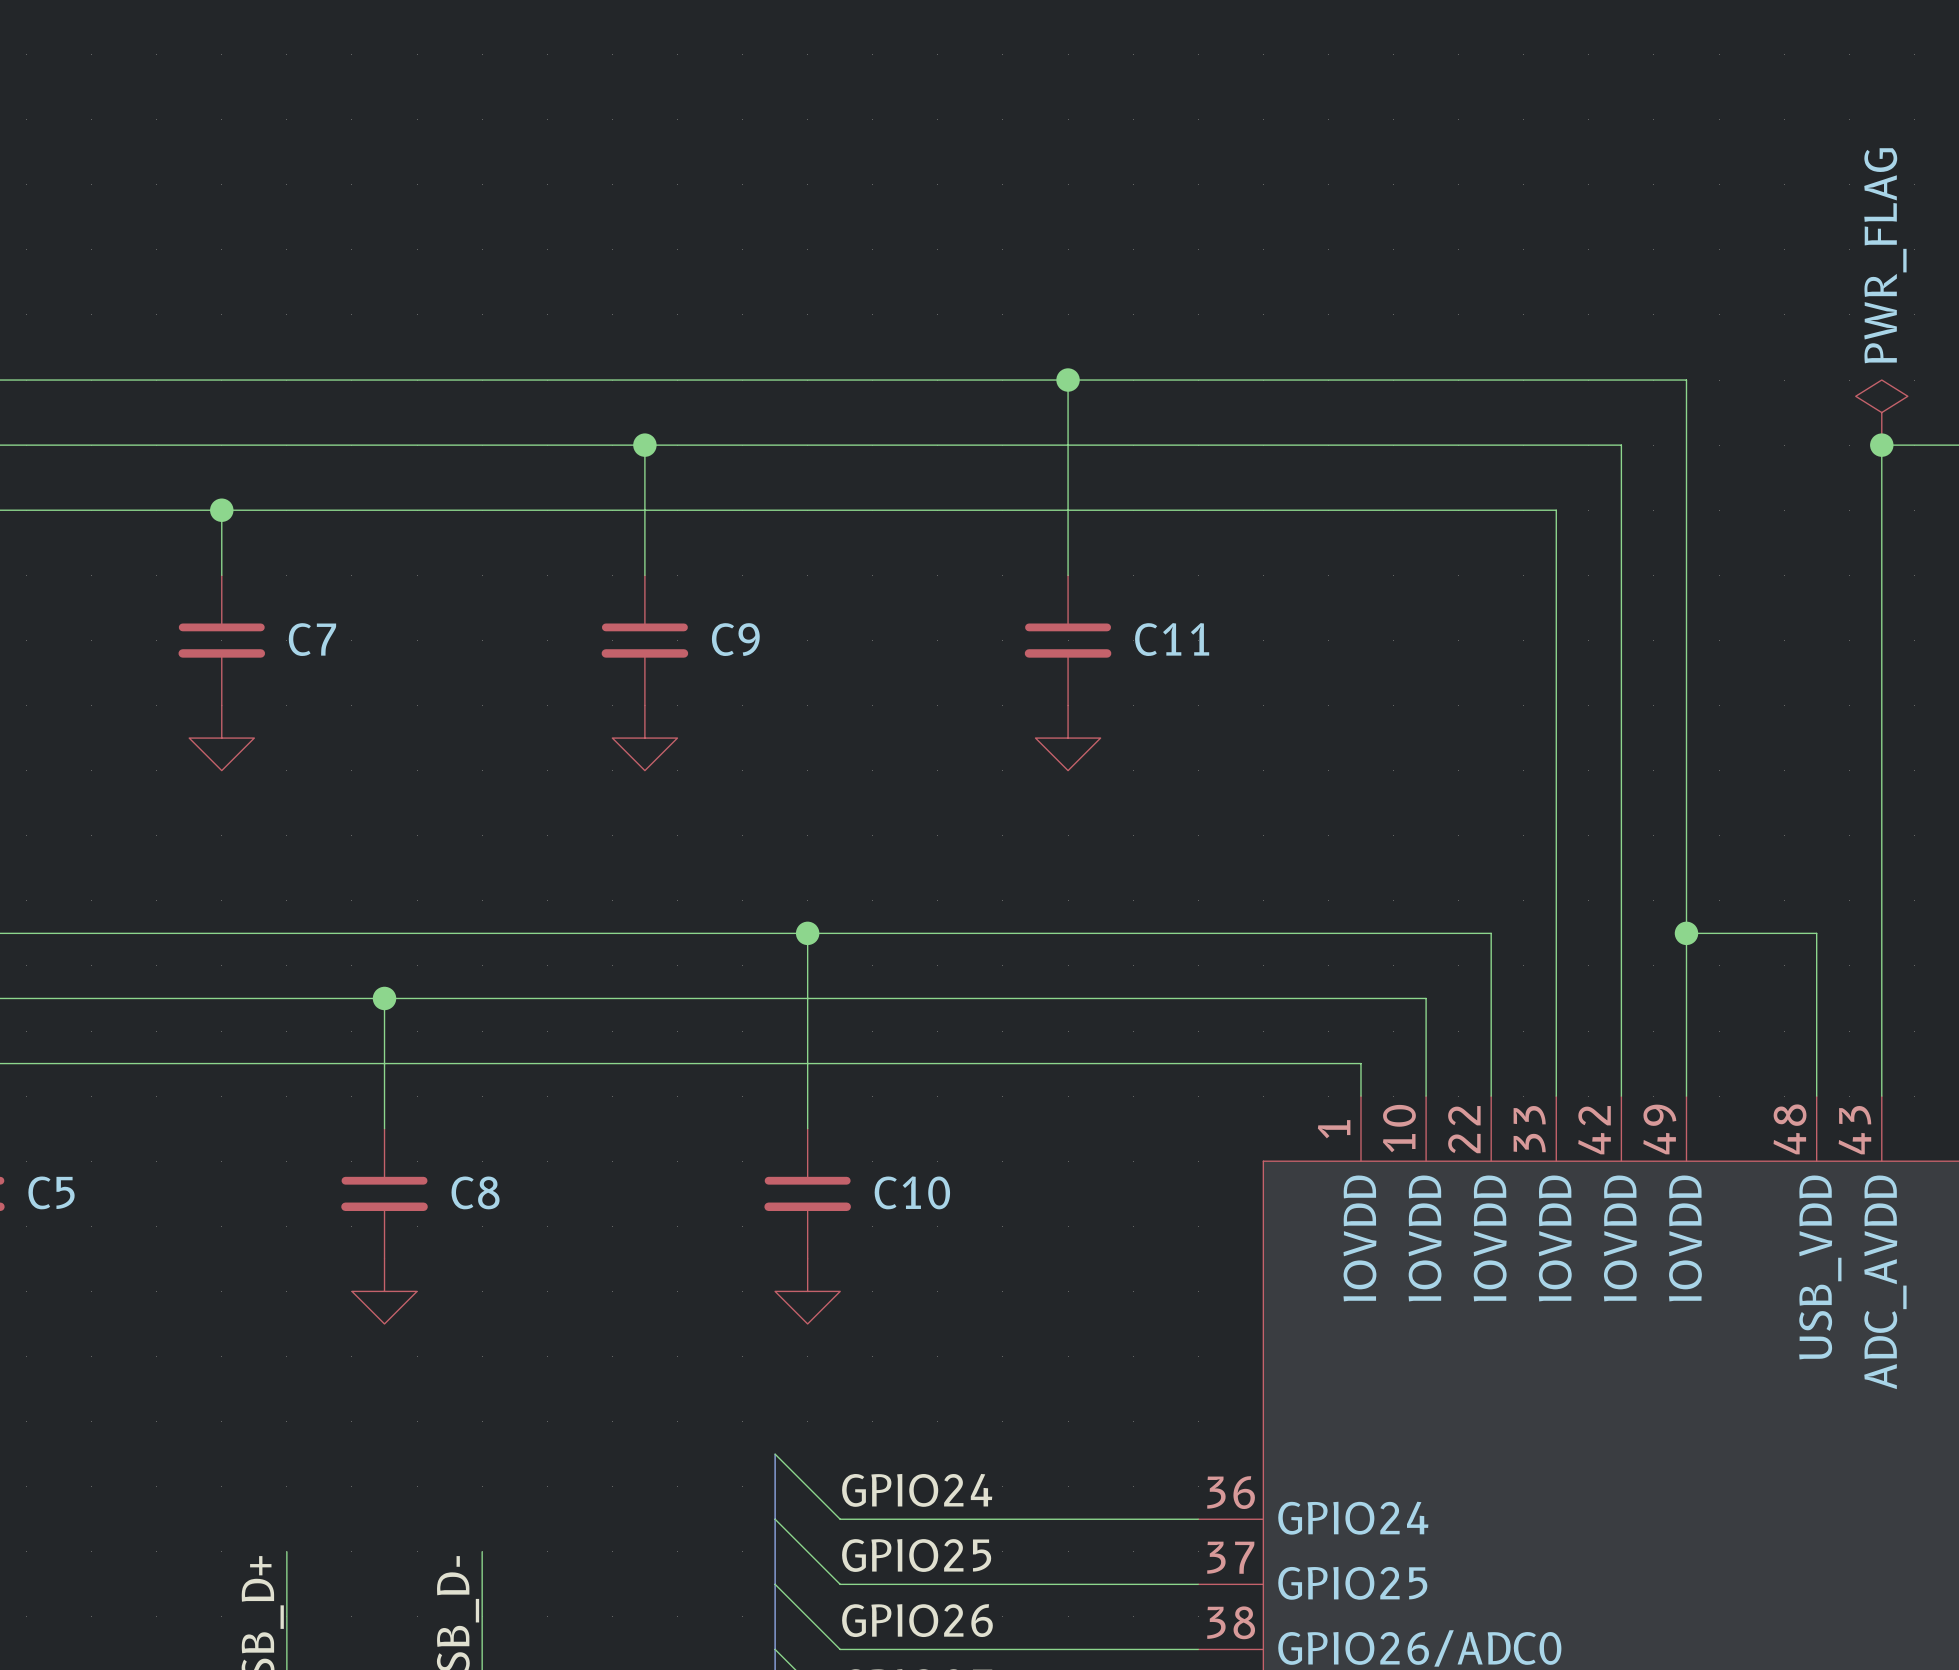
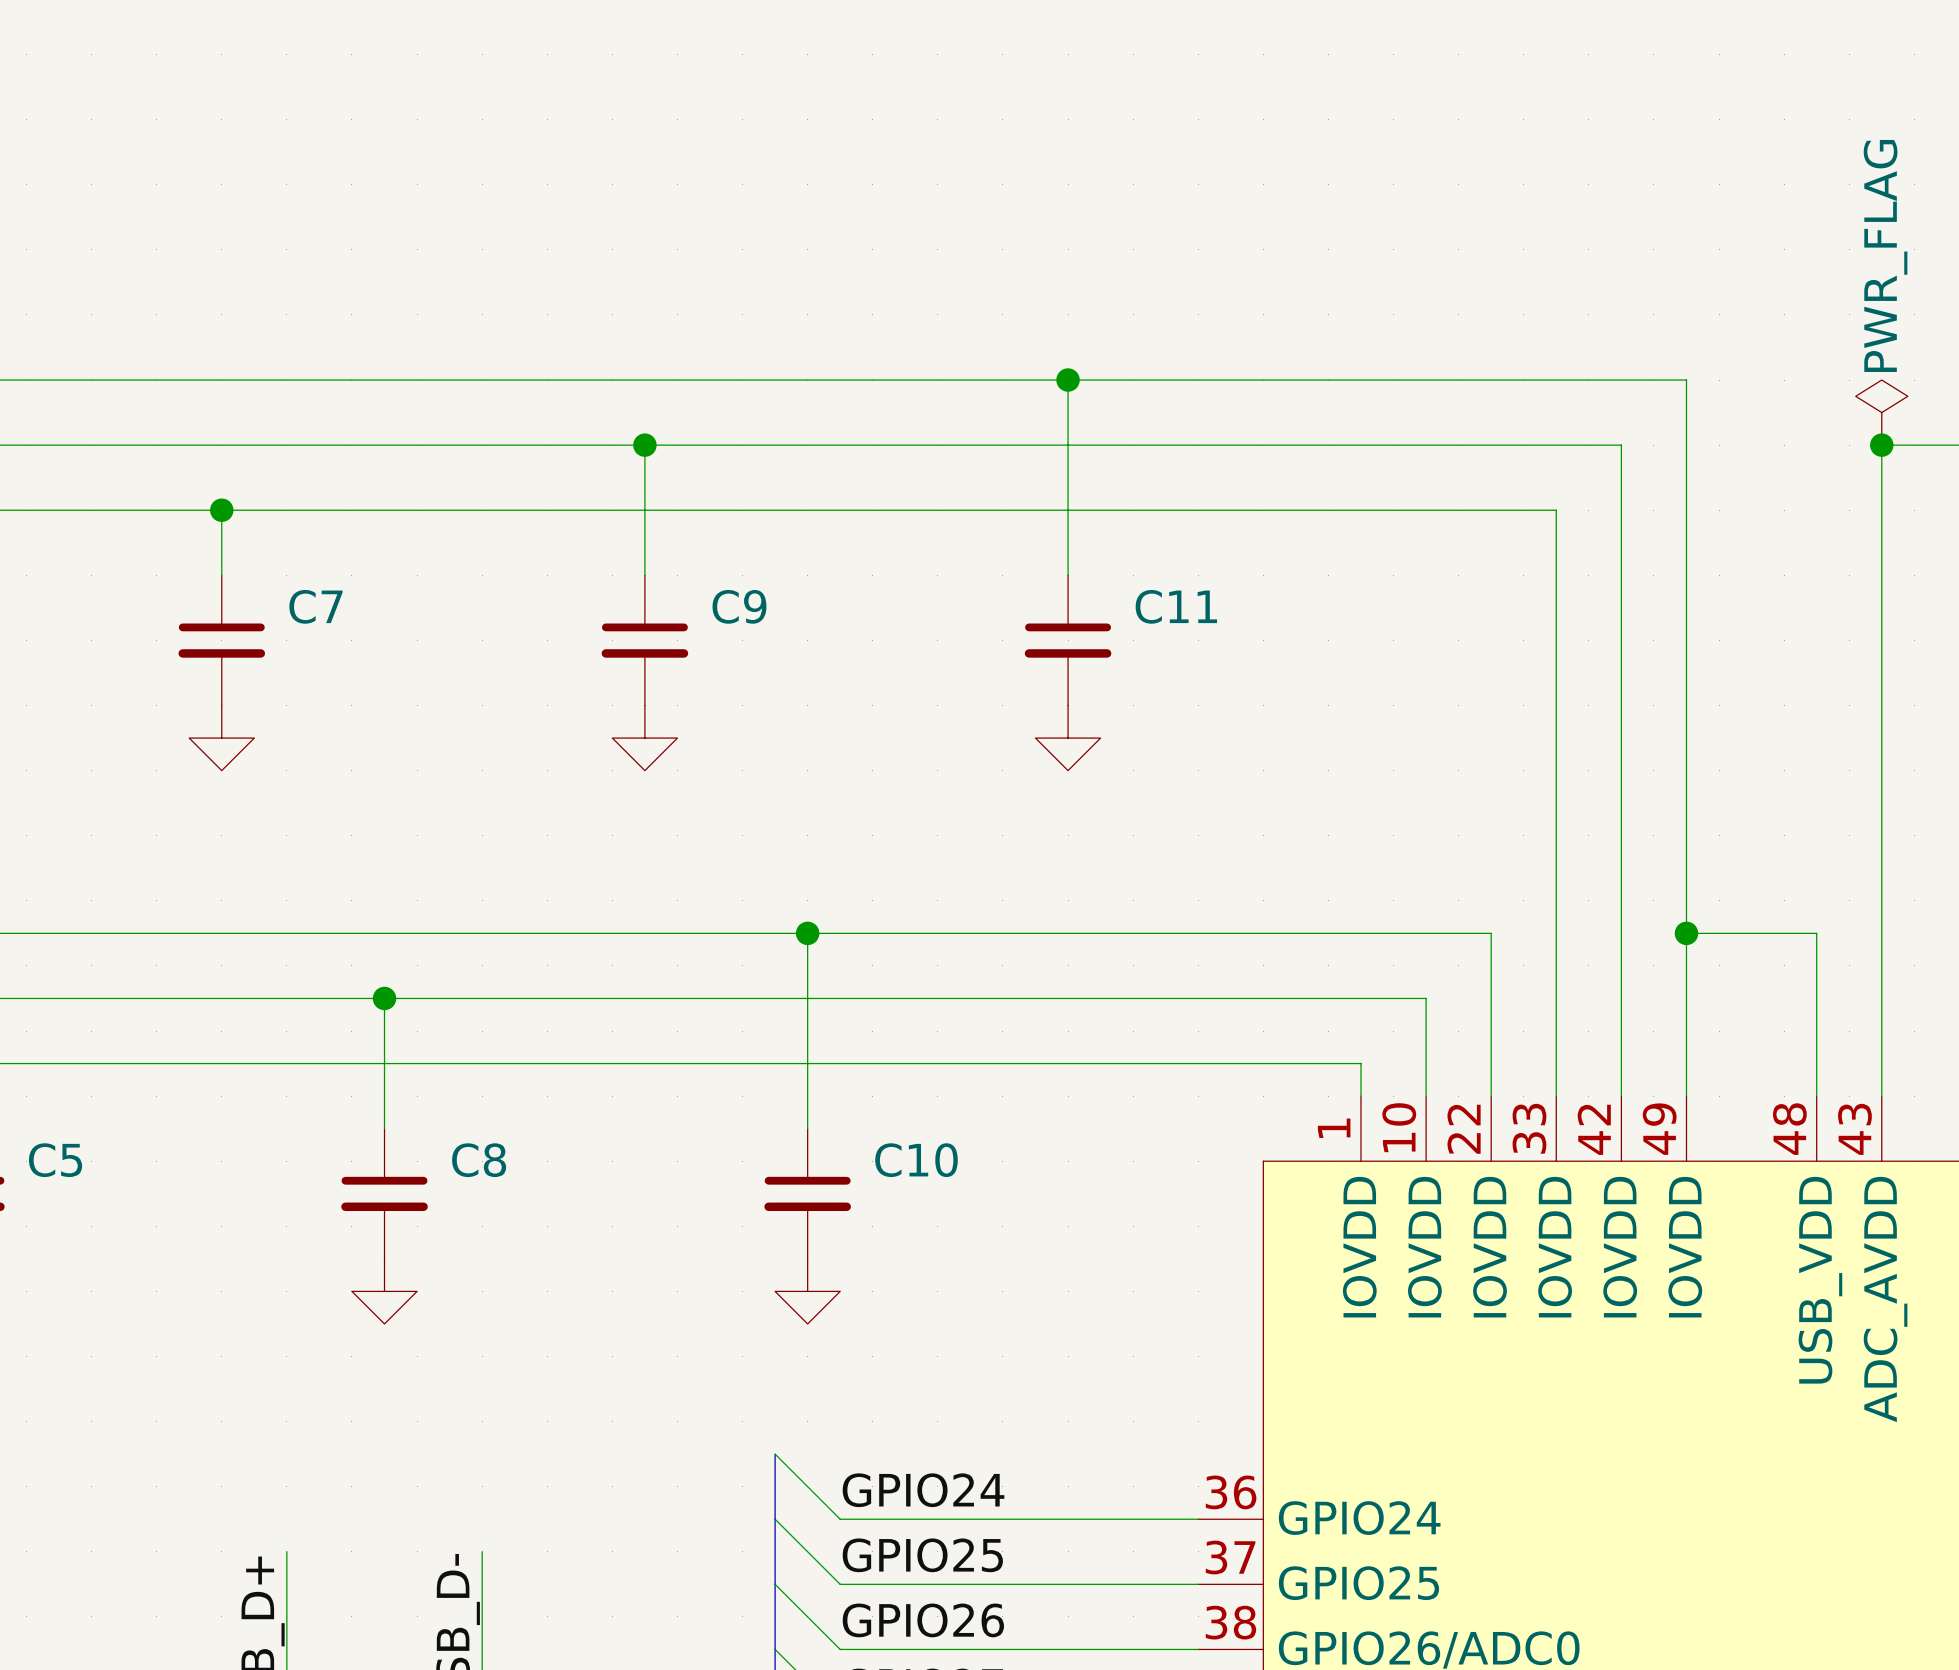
C7 name position: C7 (312, 639) -> C7 (316, 606)
C9 name position: C9 (735, 639) -> C9 (739, 606)
C11 name position: C11 (1172, 639) -> C11 (1176, 606)
C5 name position: C5 (51, 1192) -> C5 (55, 1160)
C8 name position: C8 (475, 1192) -> C8 (479, 1160)
C10 name position: C10 (912, 1192) -> C10 (916, 1160)

